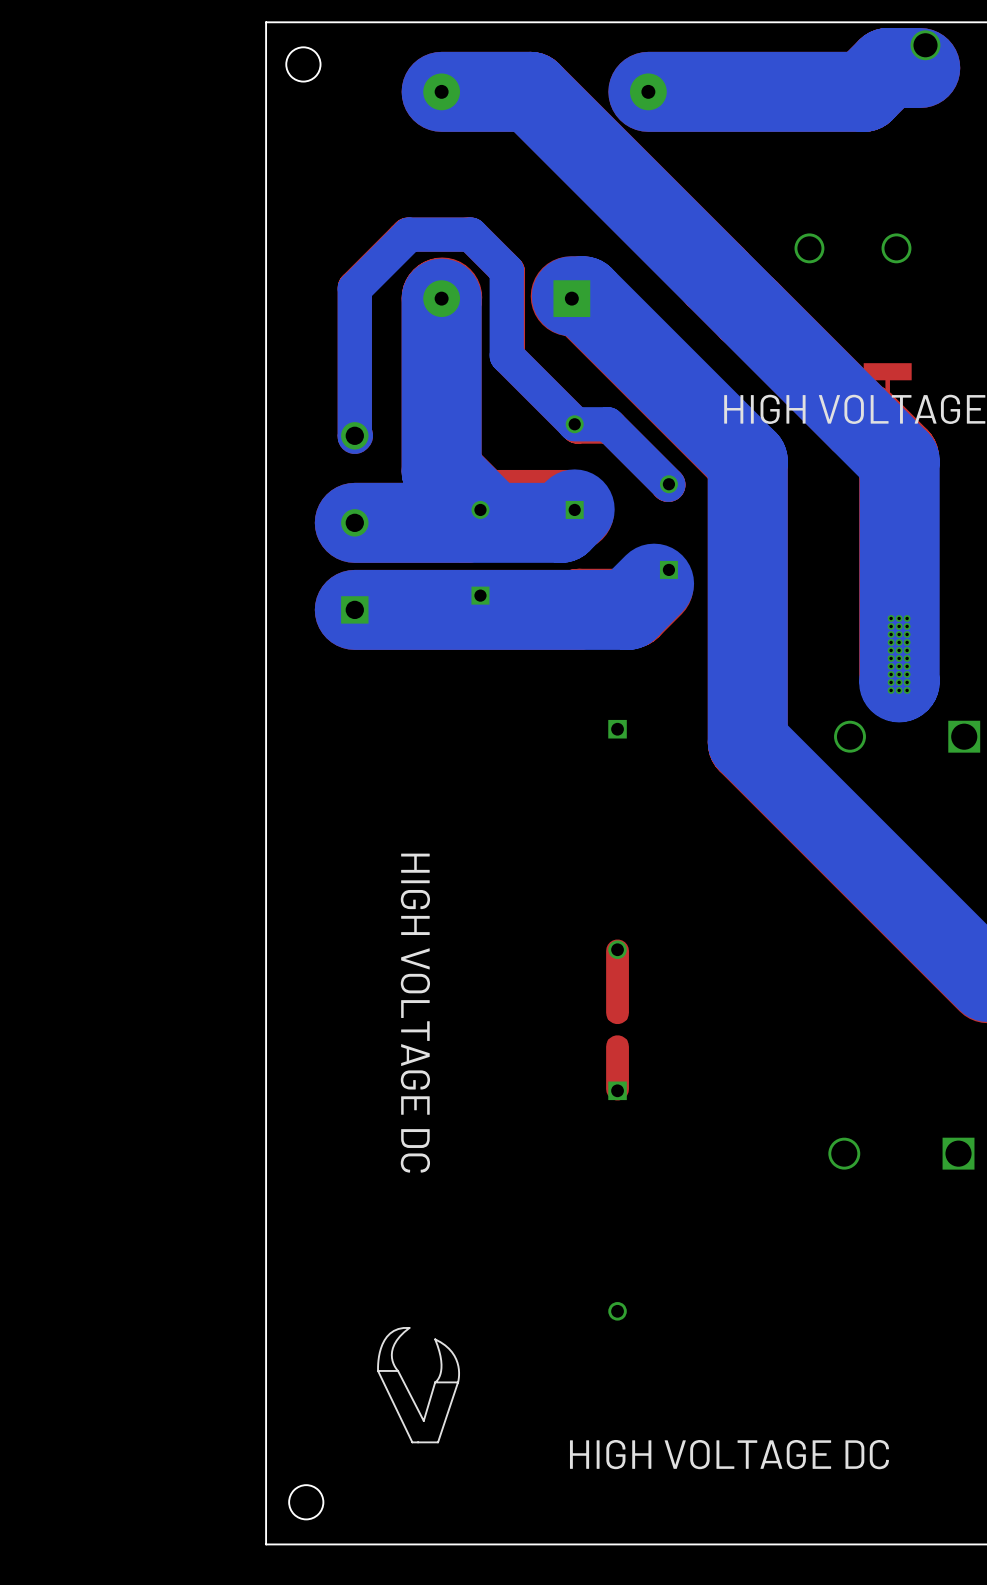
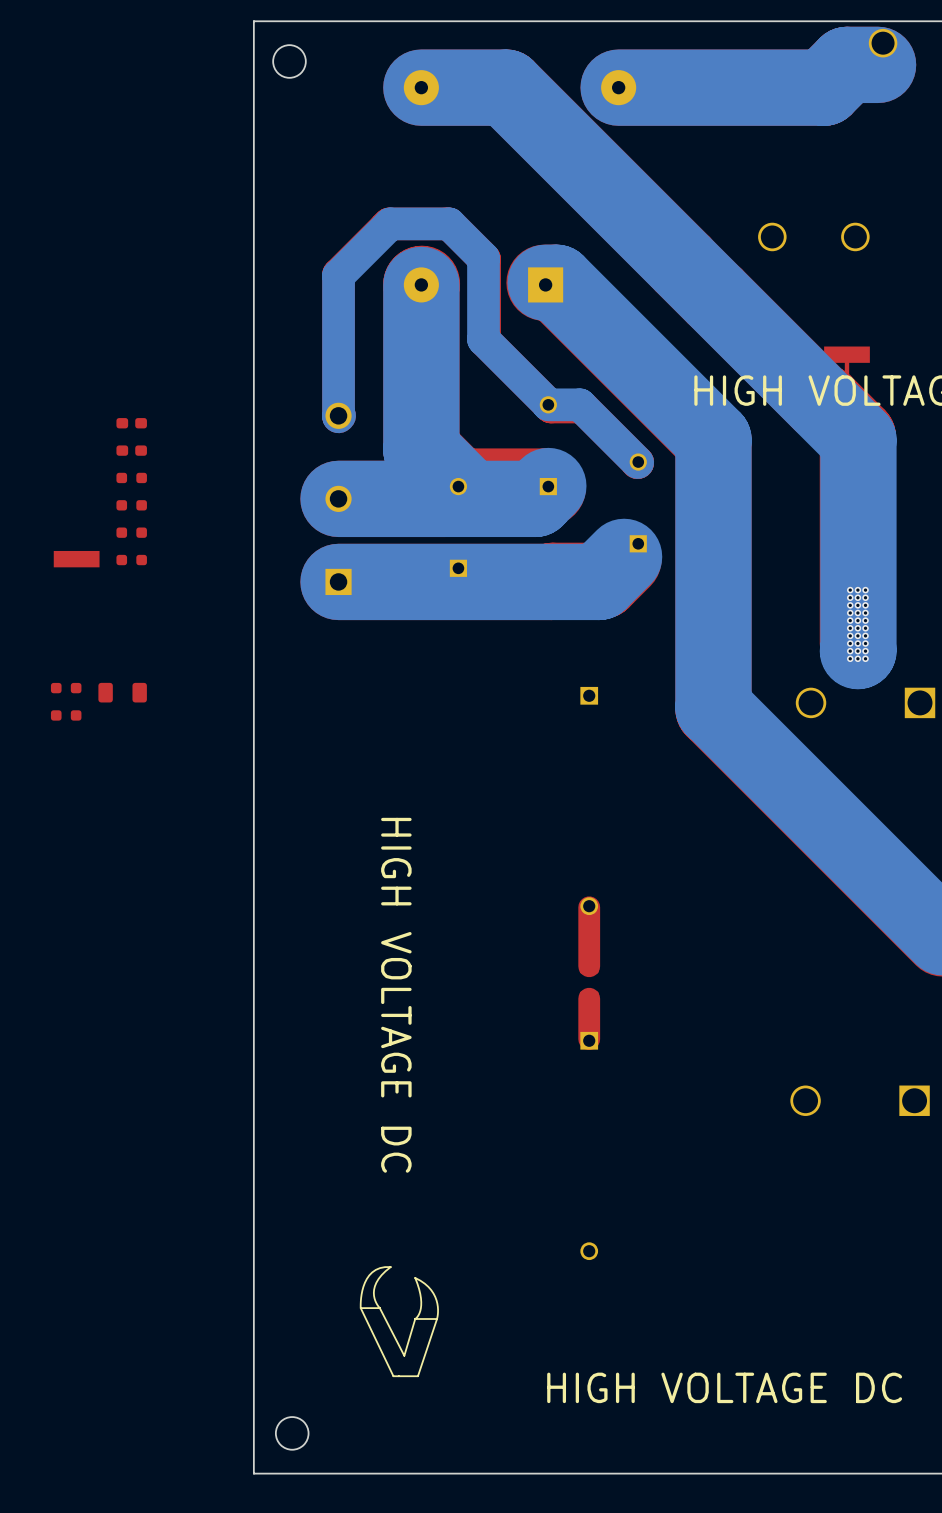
part: none -> (131, 423)
part: none -> (131, 450)
part: none -> (131, 477)
part: none -> (131, 505)
part: none -> (131, 532)
part: none -> (76, 559)
part: none -> (131, 560)
part: none -> (66, 688)
part: none -> (122, 692)
part: none -> (66, 715)

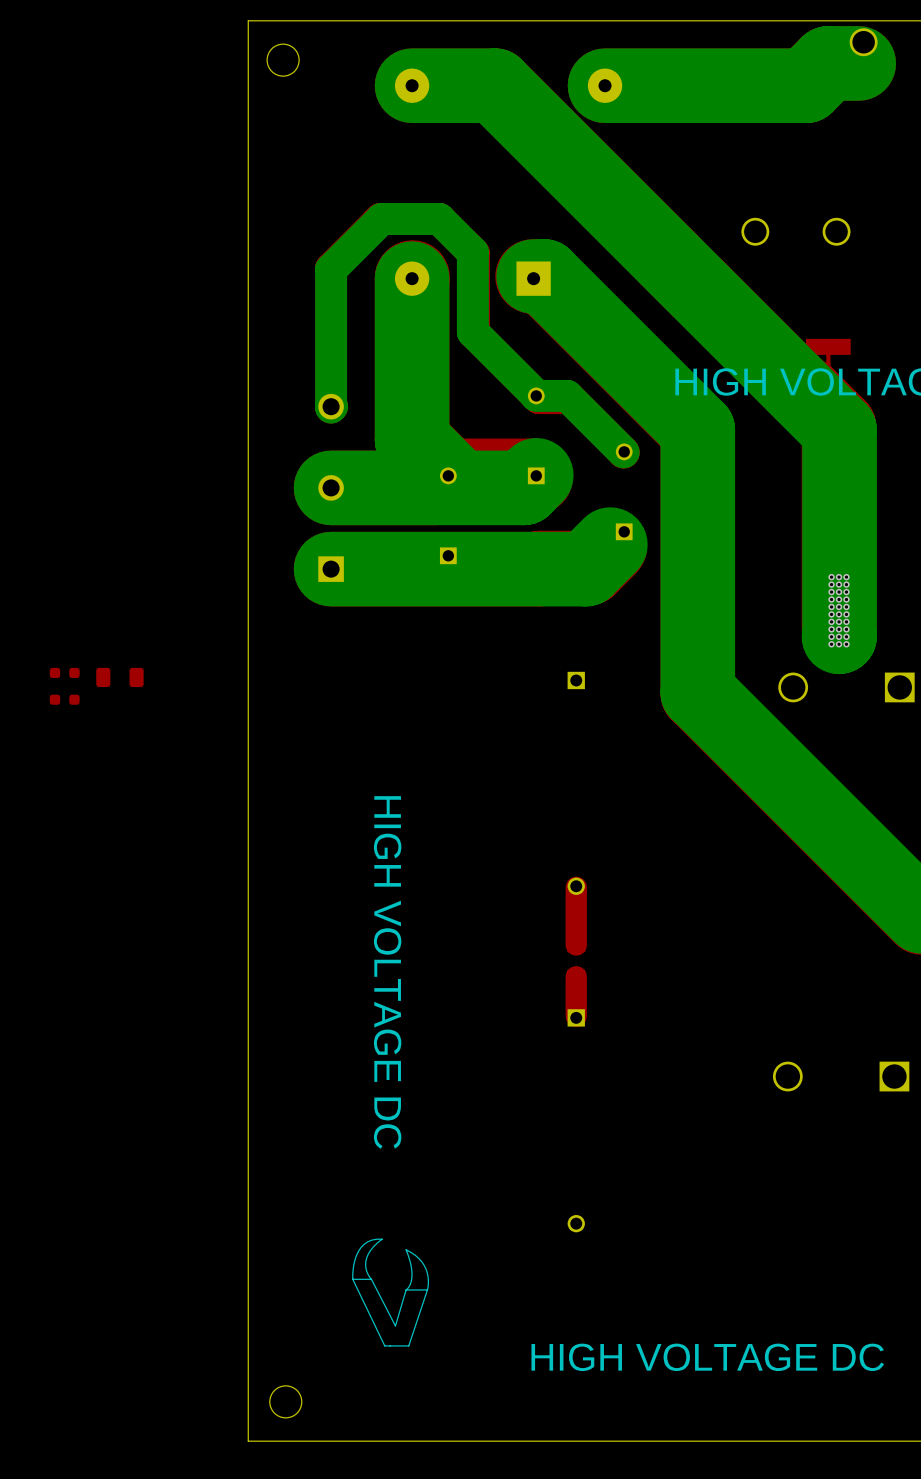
part: (131, 423) -> none
part: (131, 450) -> none
part: (131, 477) -> none
part: (131, 505) -> none
part: (131, 532) -> none
part: (76, 559) -> none
part: (131, 560) -> none

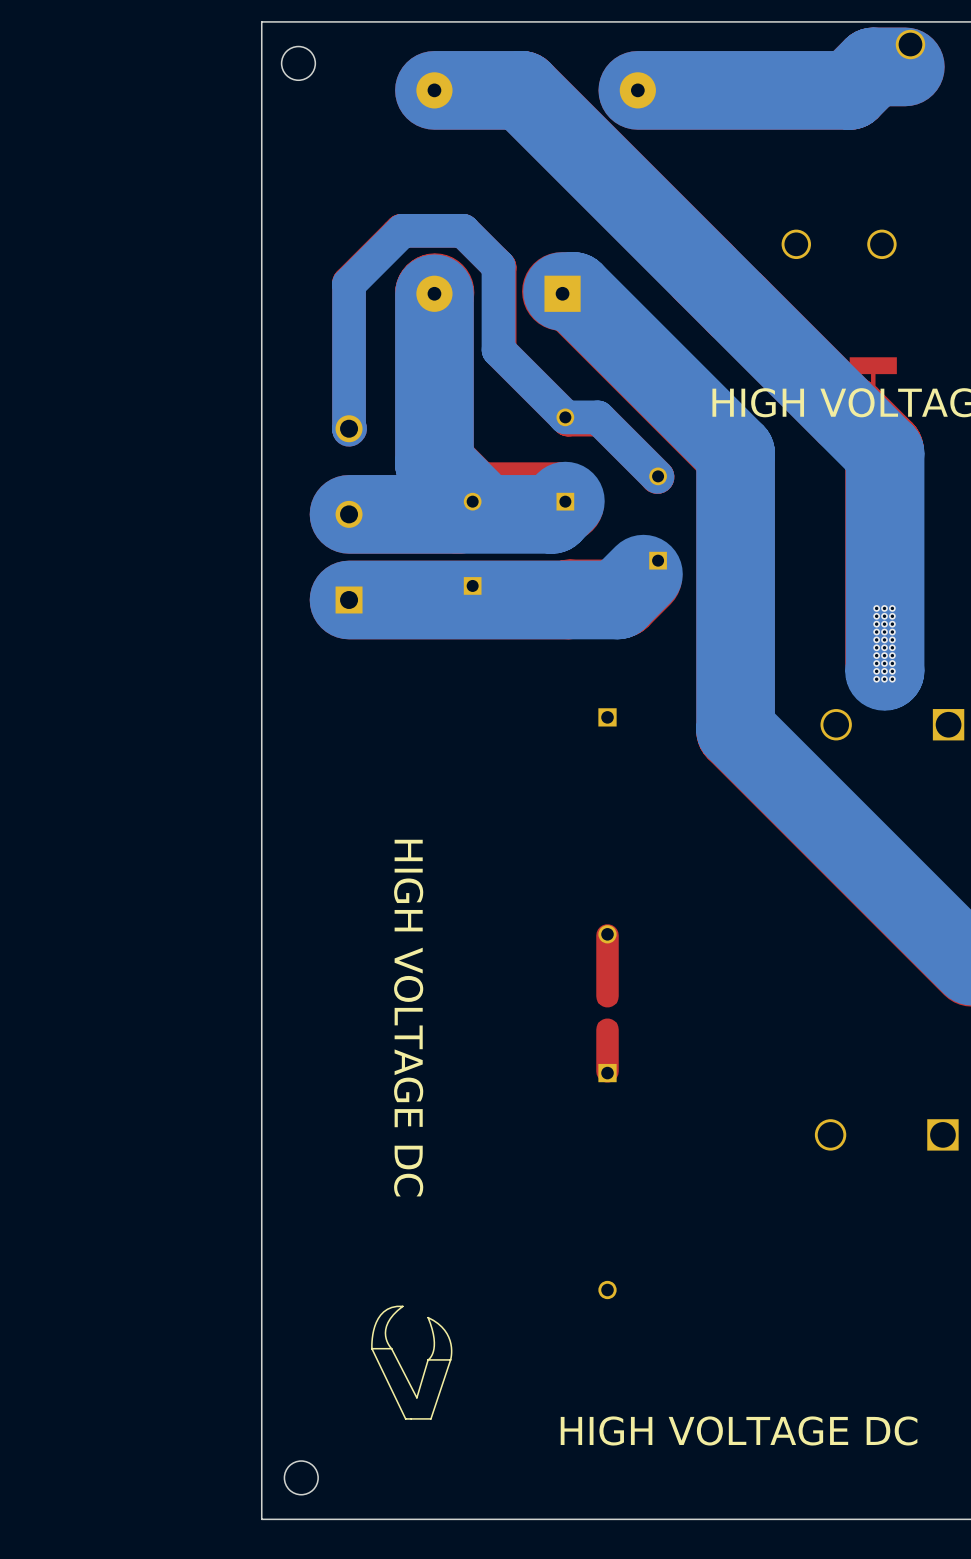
part: (64, 672) -> none
part: (119, 677) -> none
part: (64, 699) -> none

